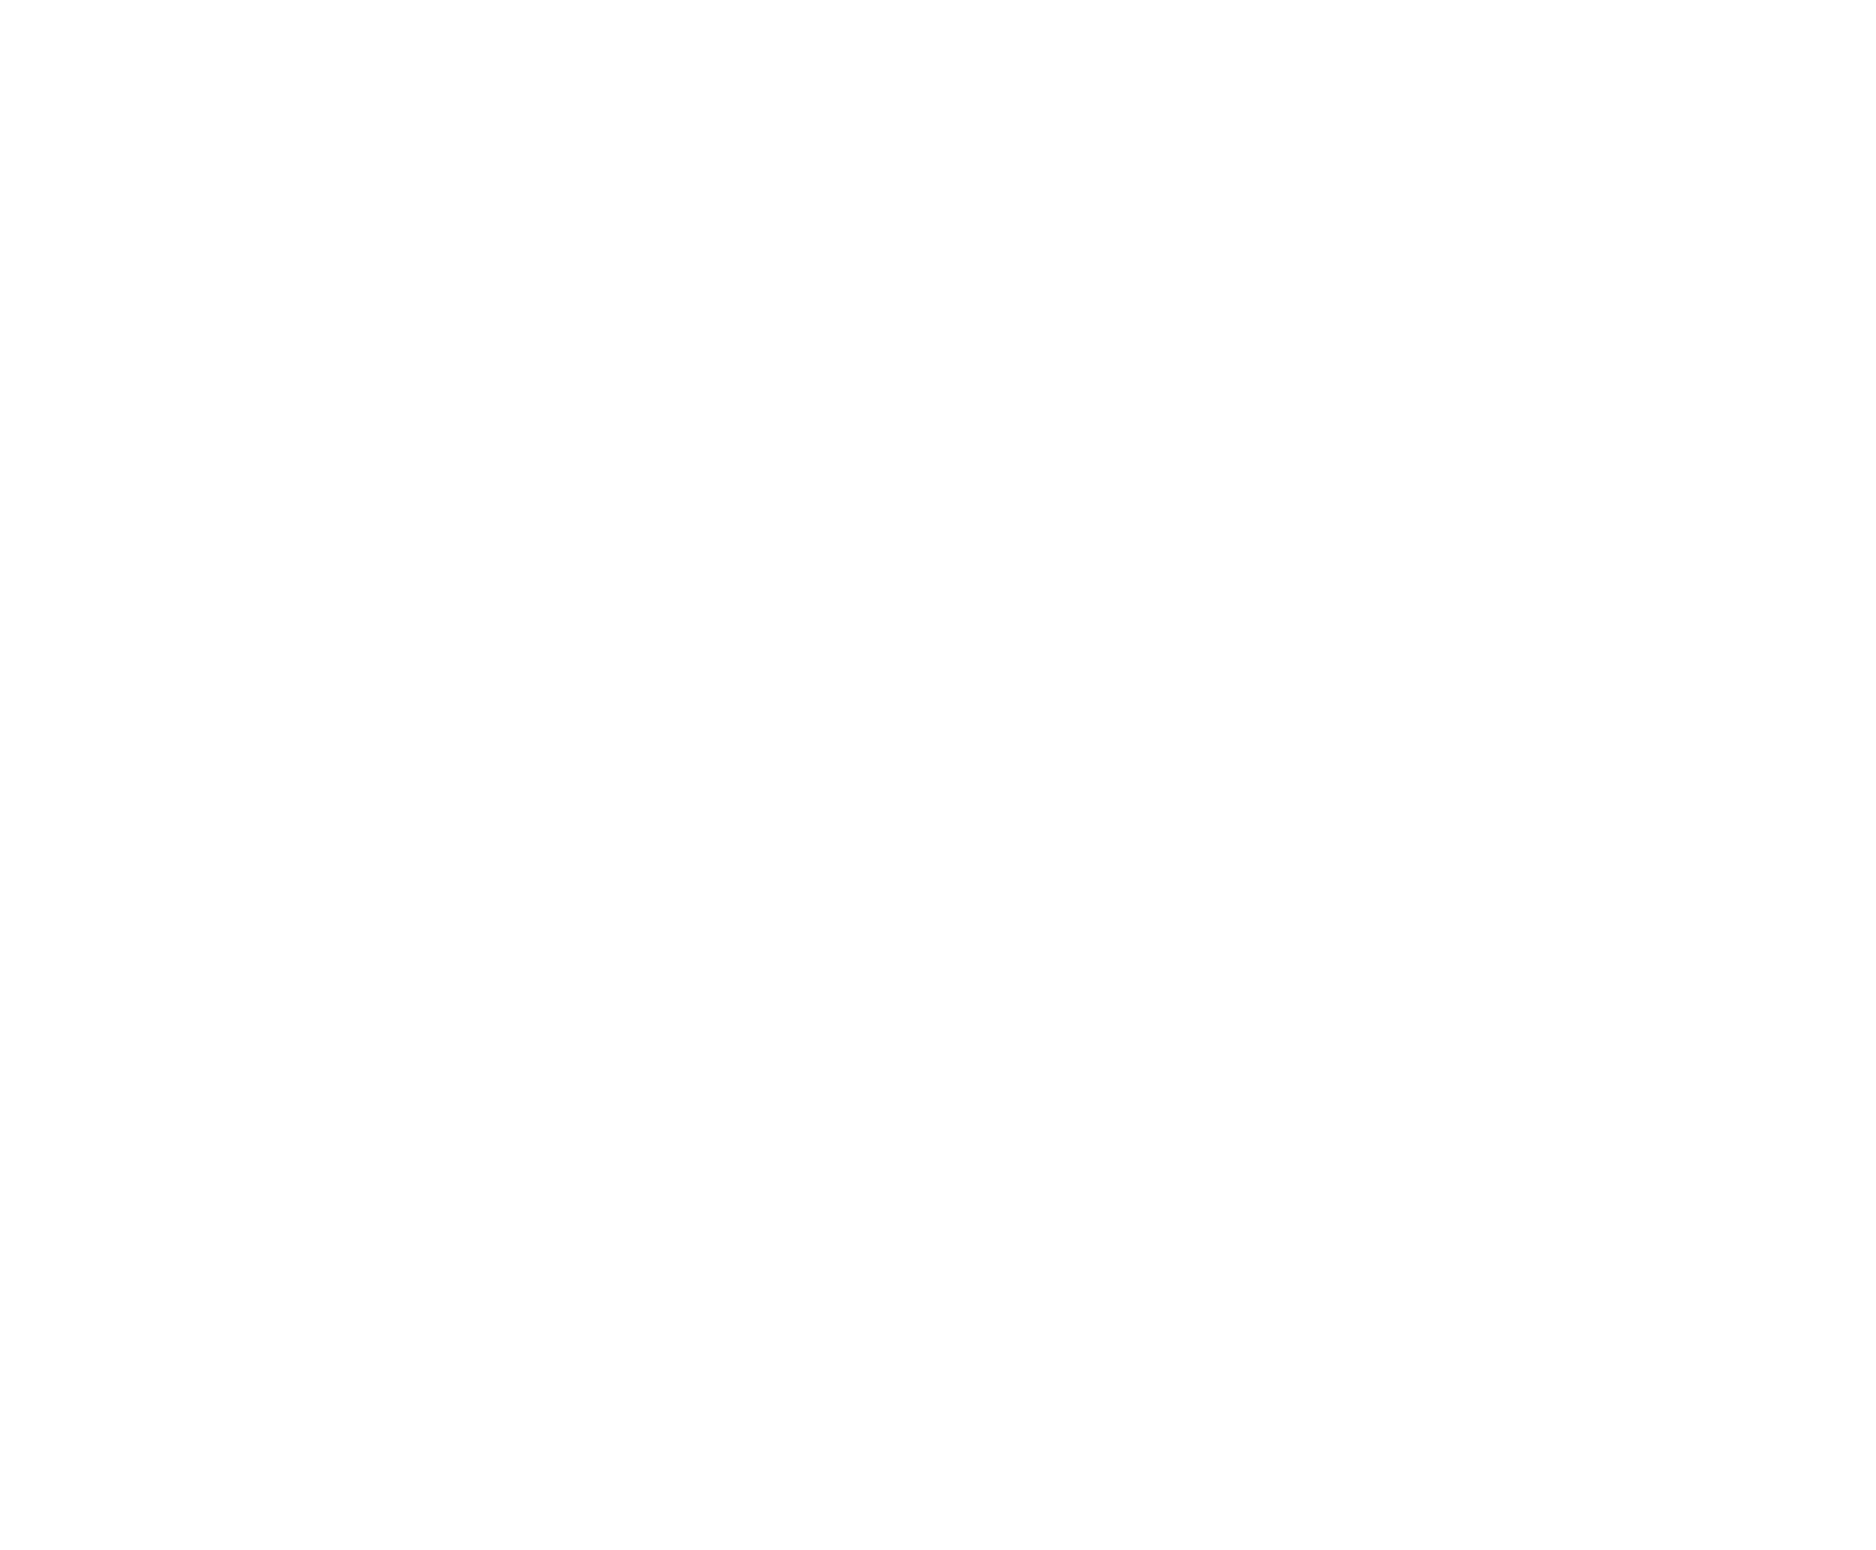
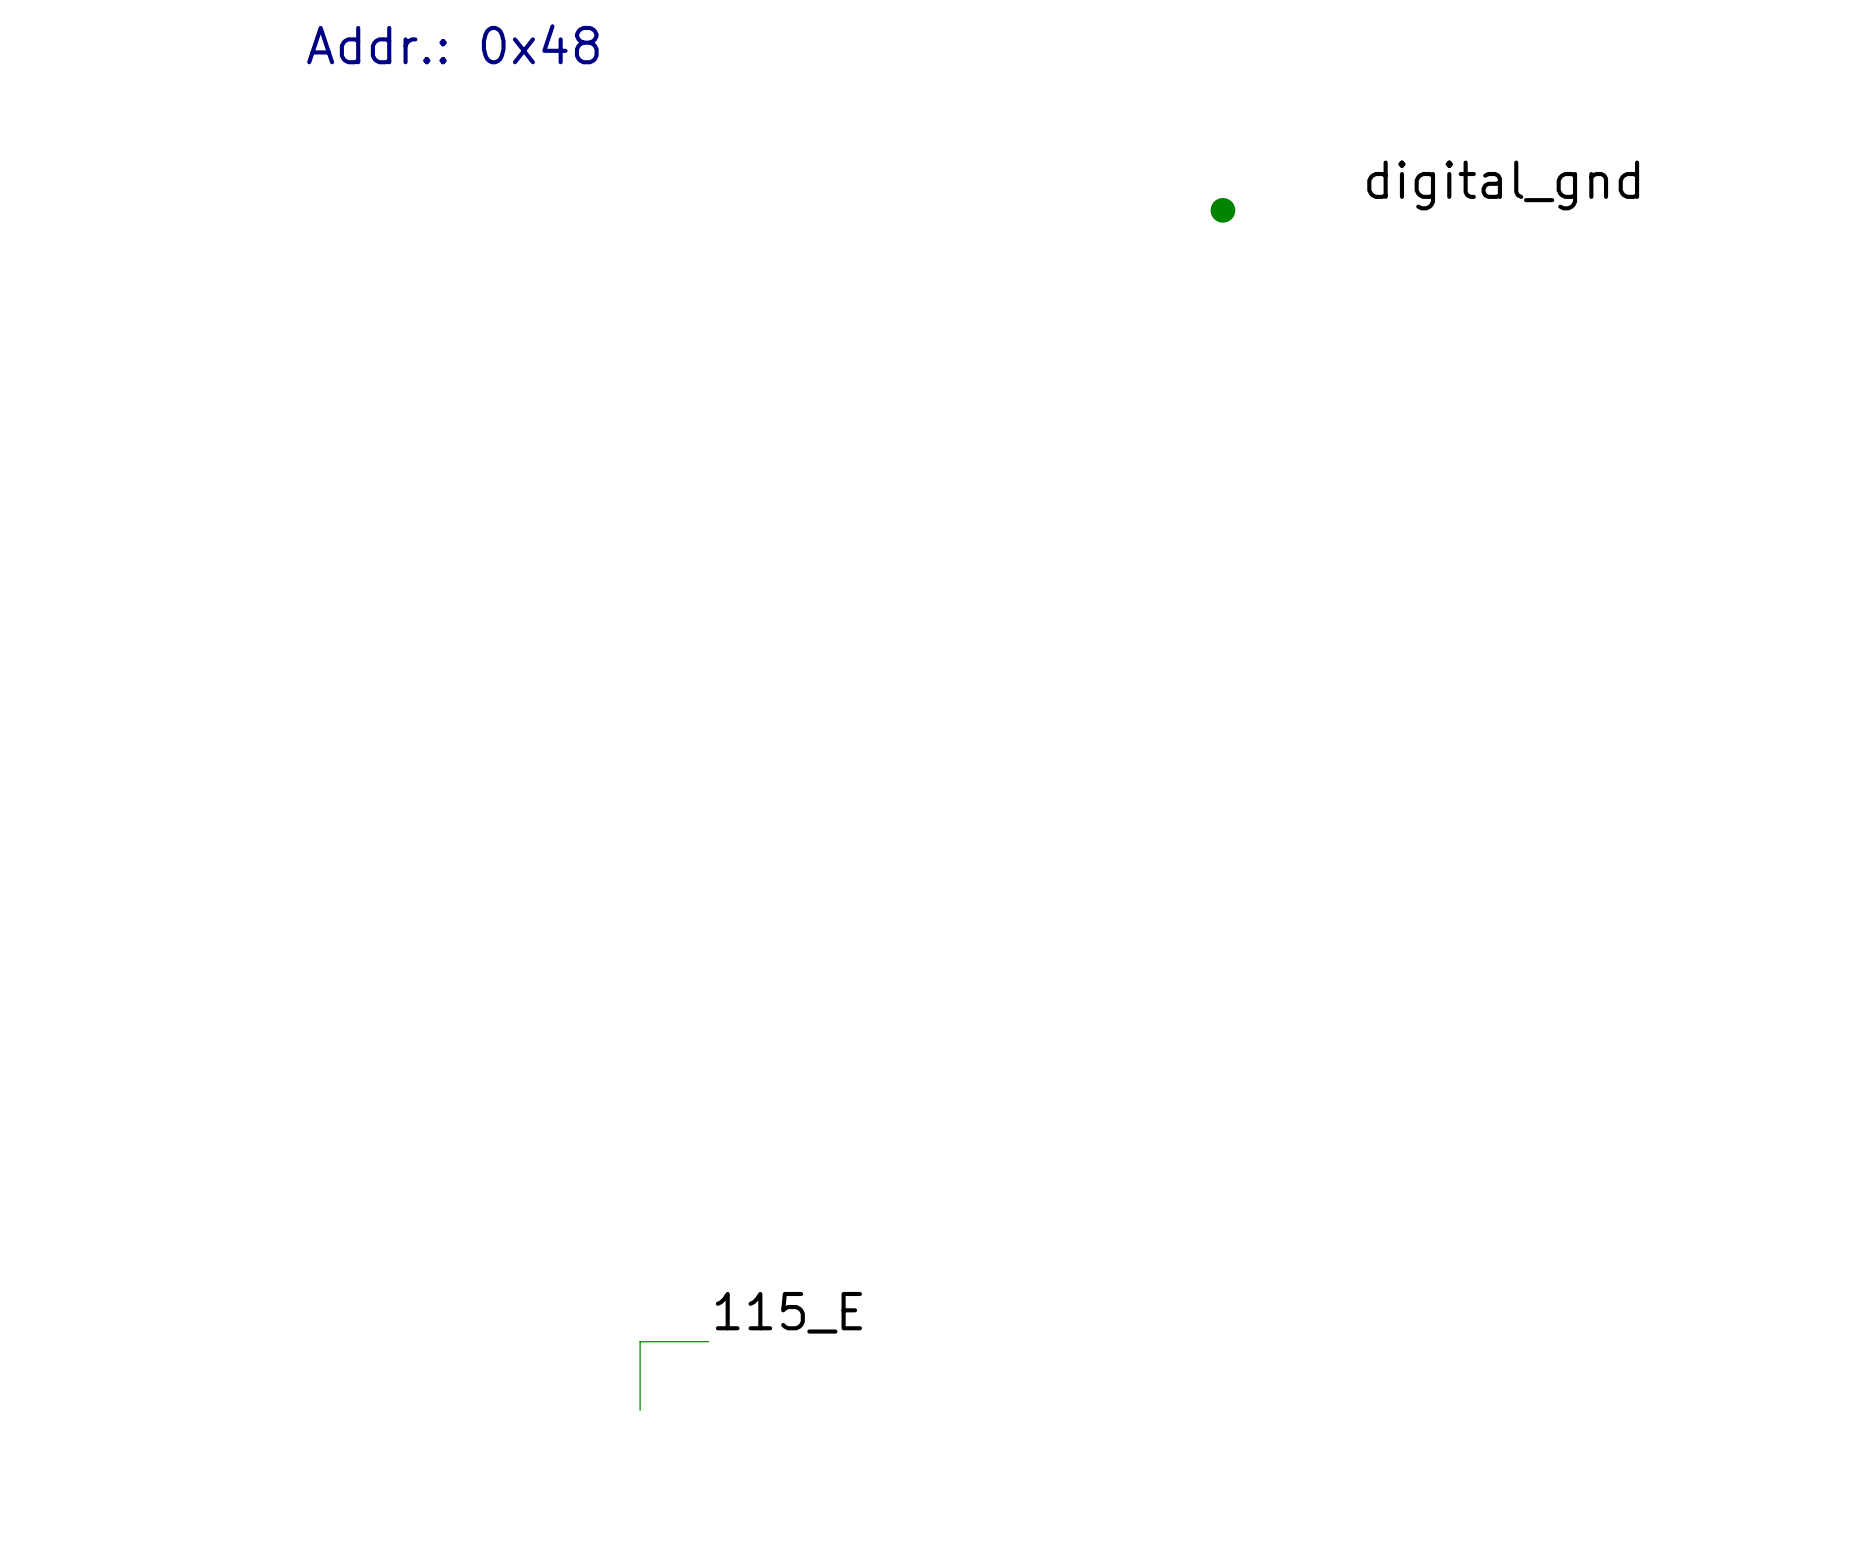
text: none -> Addr.: 0x48 (452, 44)
label: none -> digital_gnd (1503, 185)
junction: none -> (1222, 210)
label: none -> 115_E (788, 1312)
wire: none -> (708, 1341) (640, 1341) (640, 1410)

